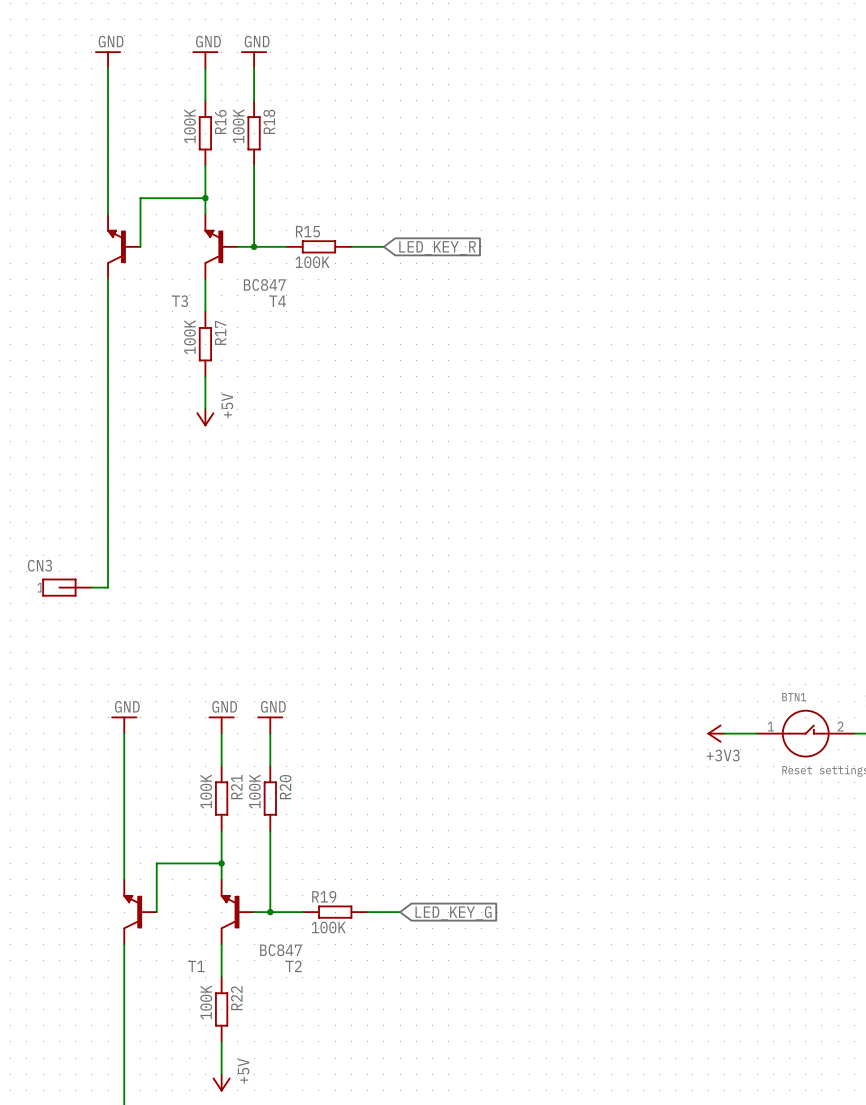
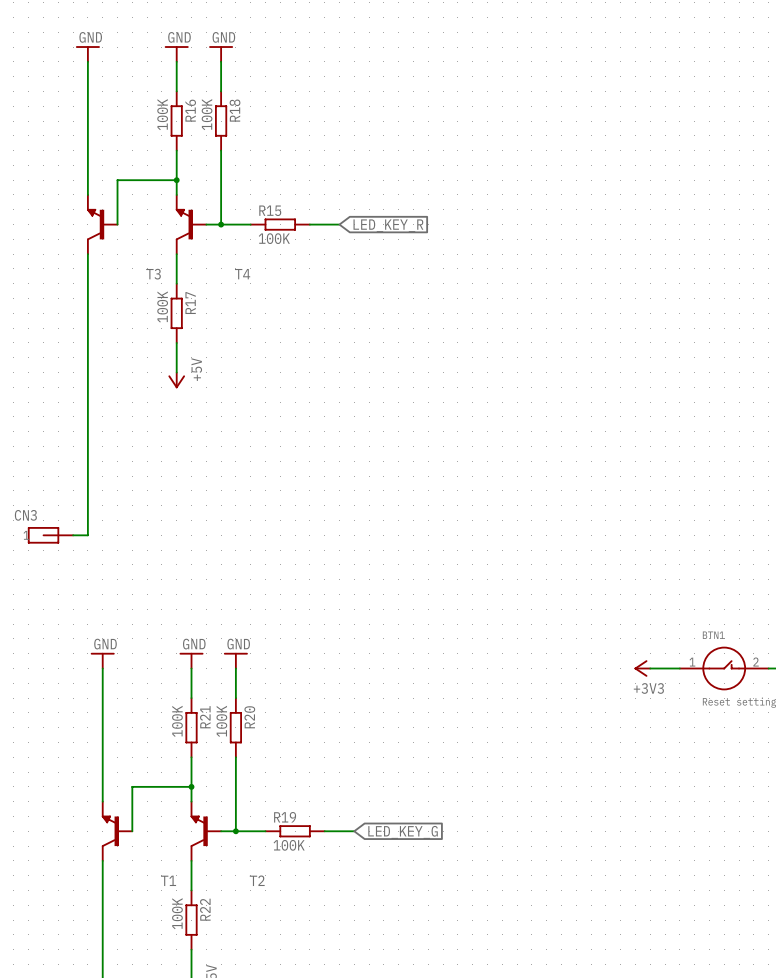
T4 value: BC847 (264, 284) -> none
T2 value: BC847 (280, 950) -> none

